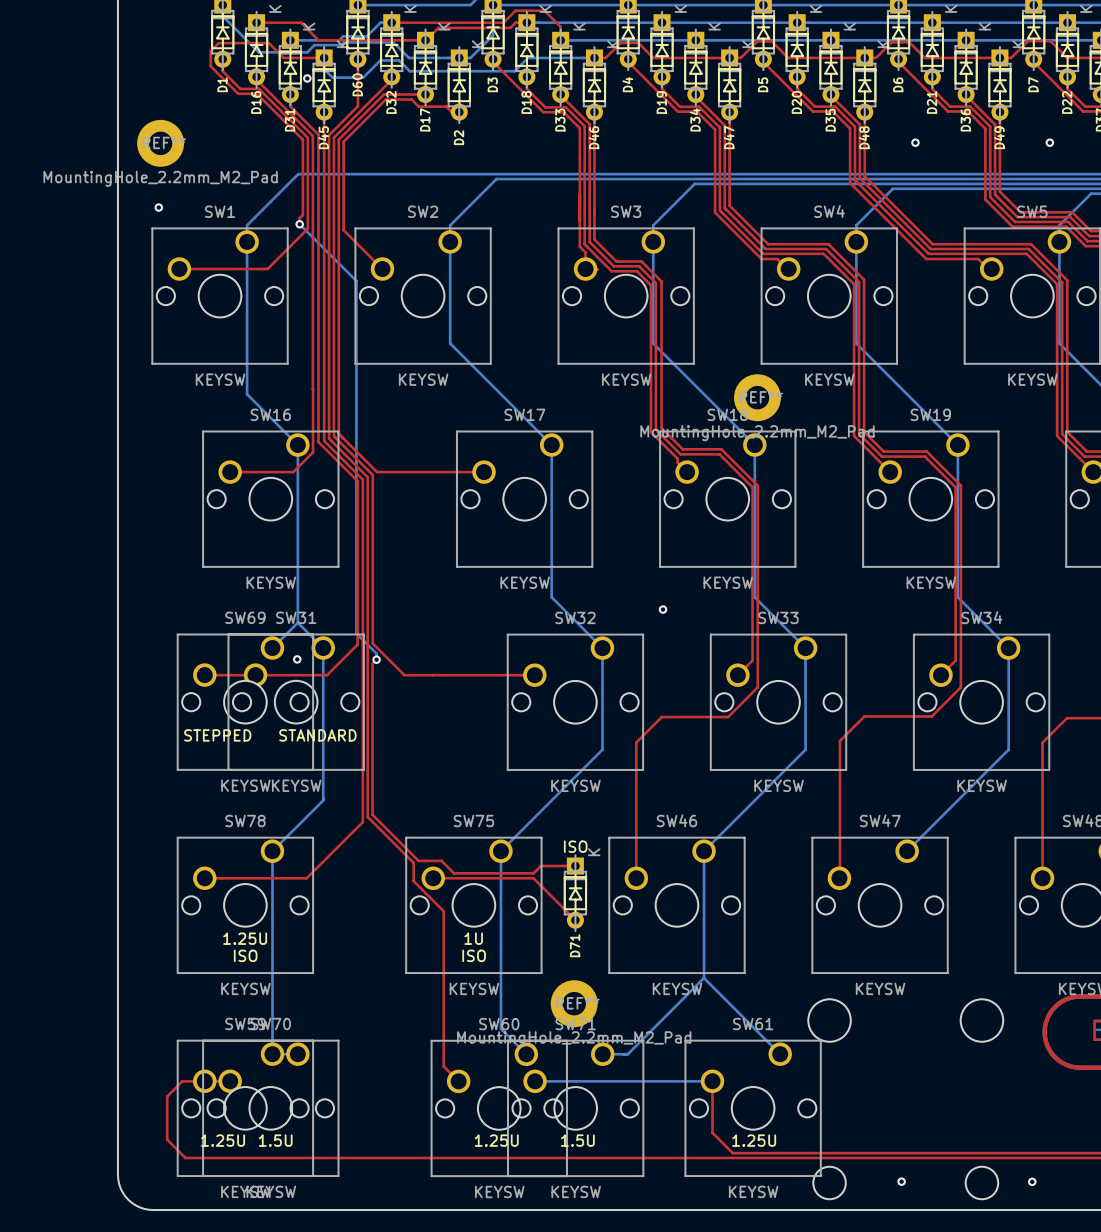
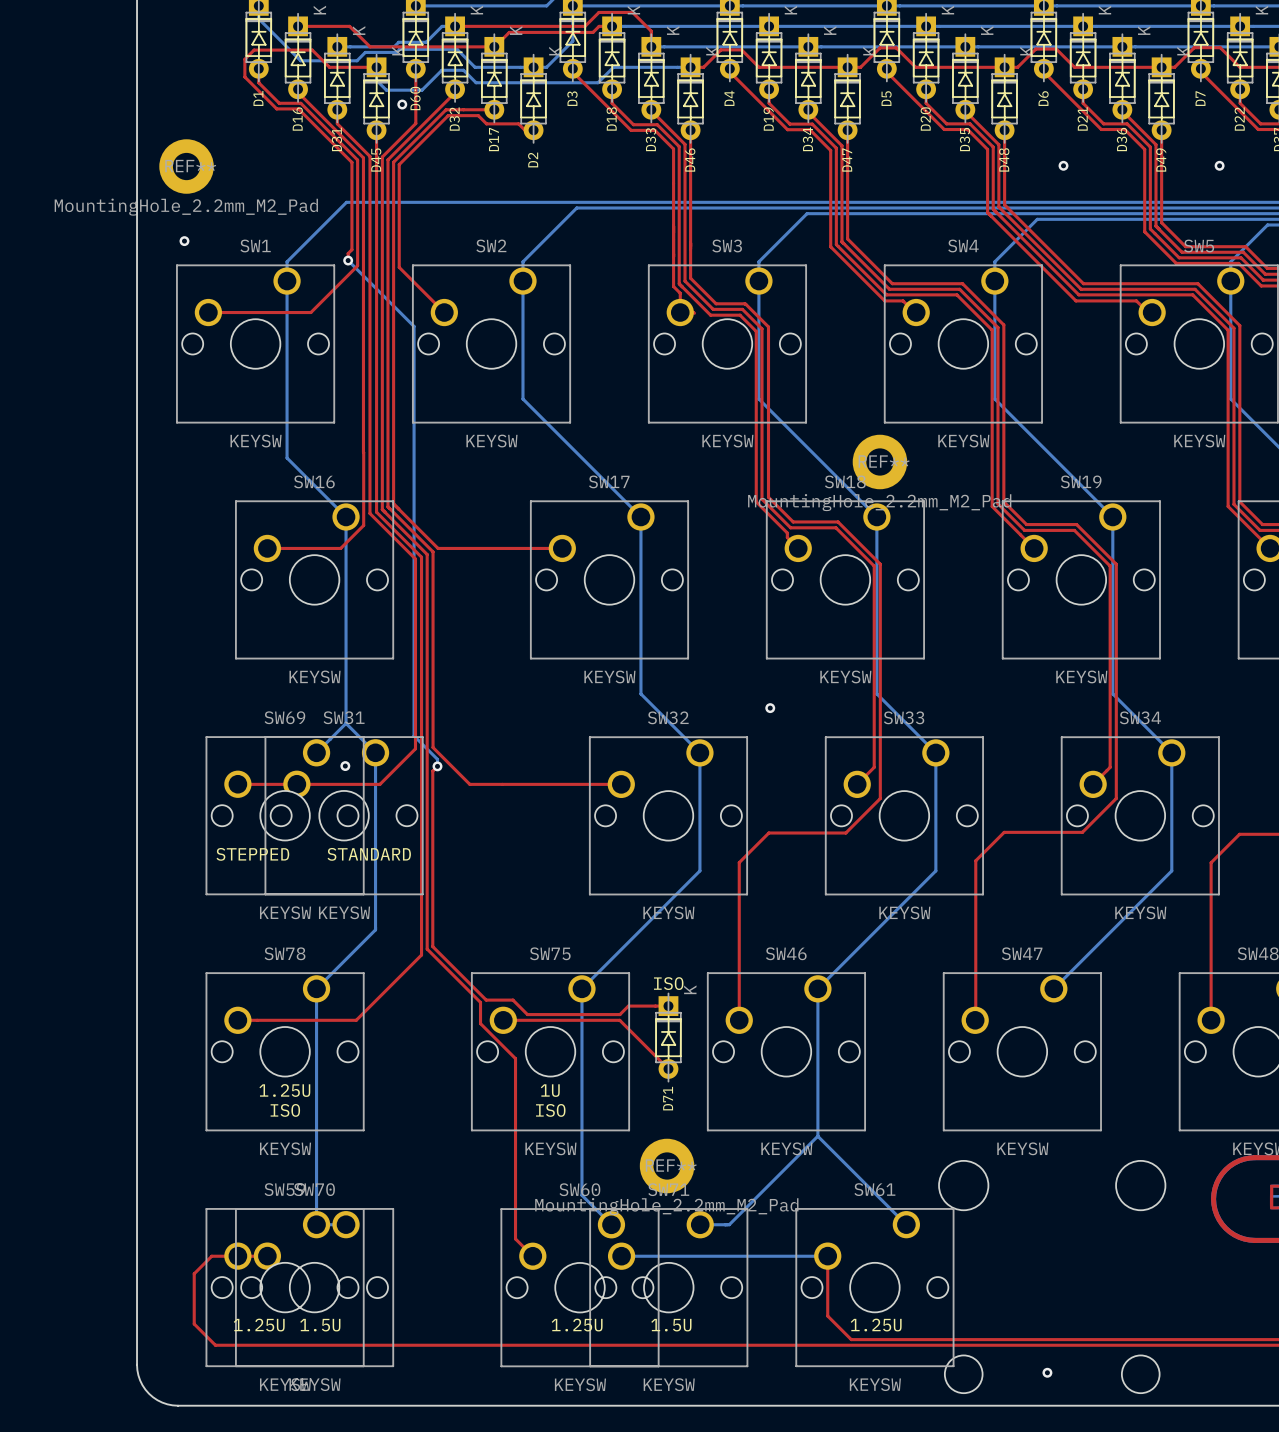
via position: (307, 78) -> (402, 104)
via: (1032, 1181) -> none

